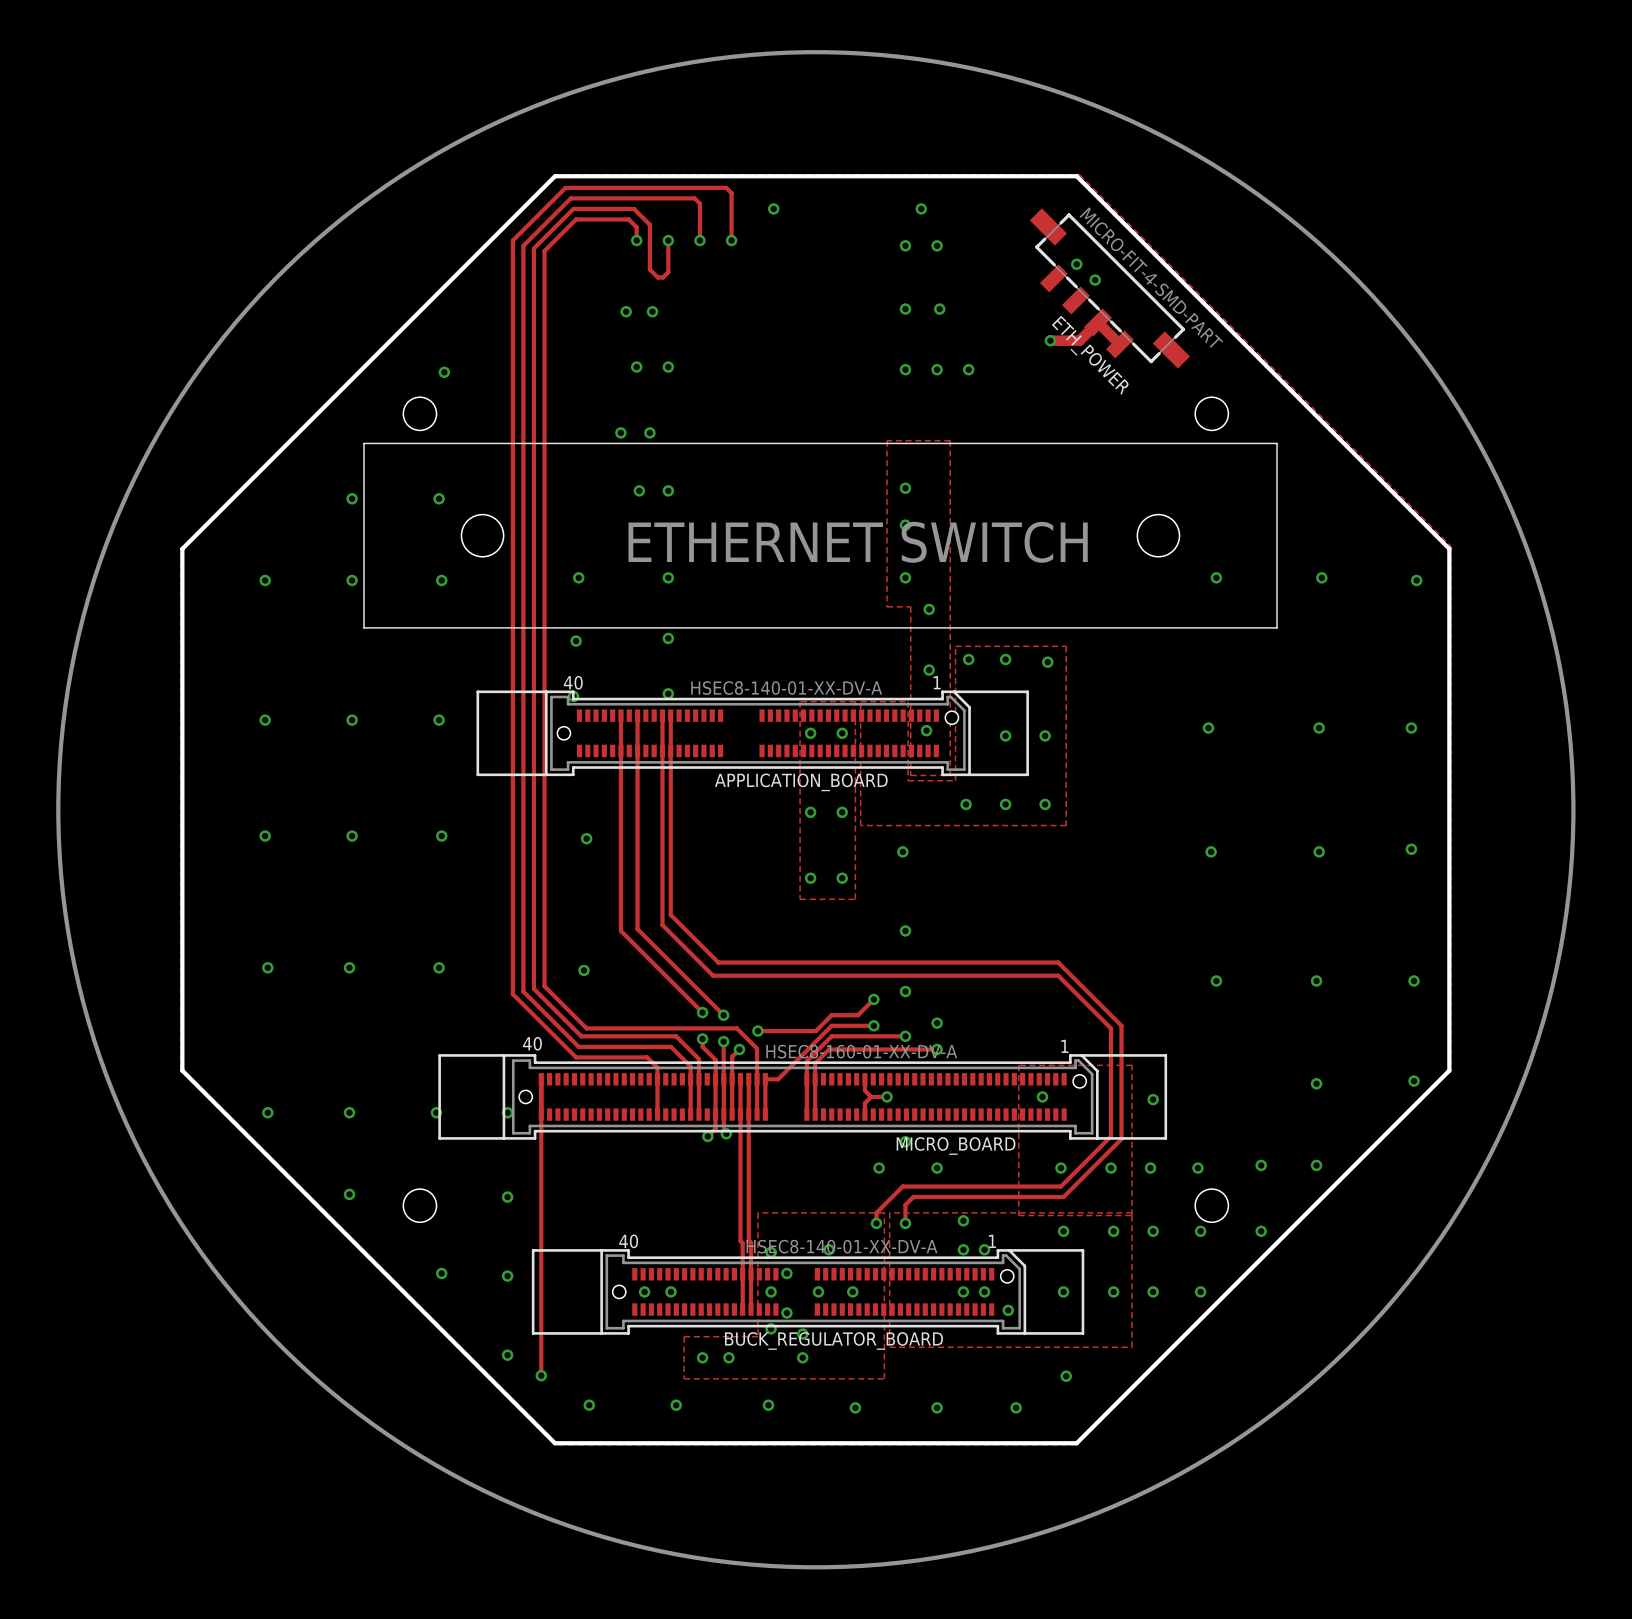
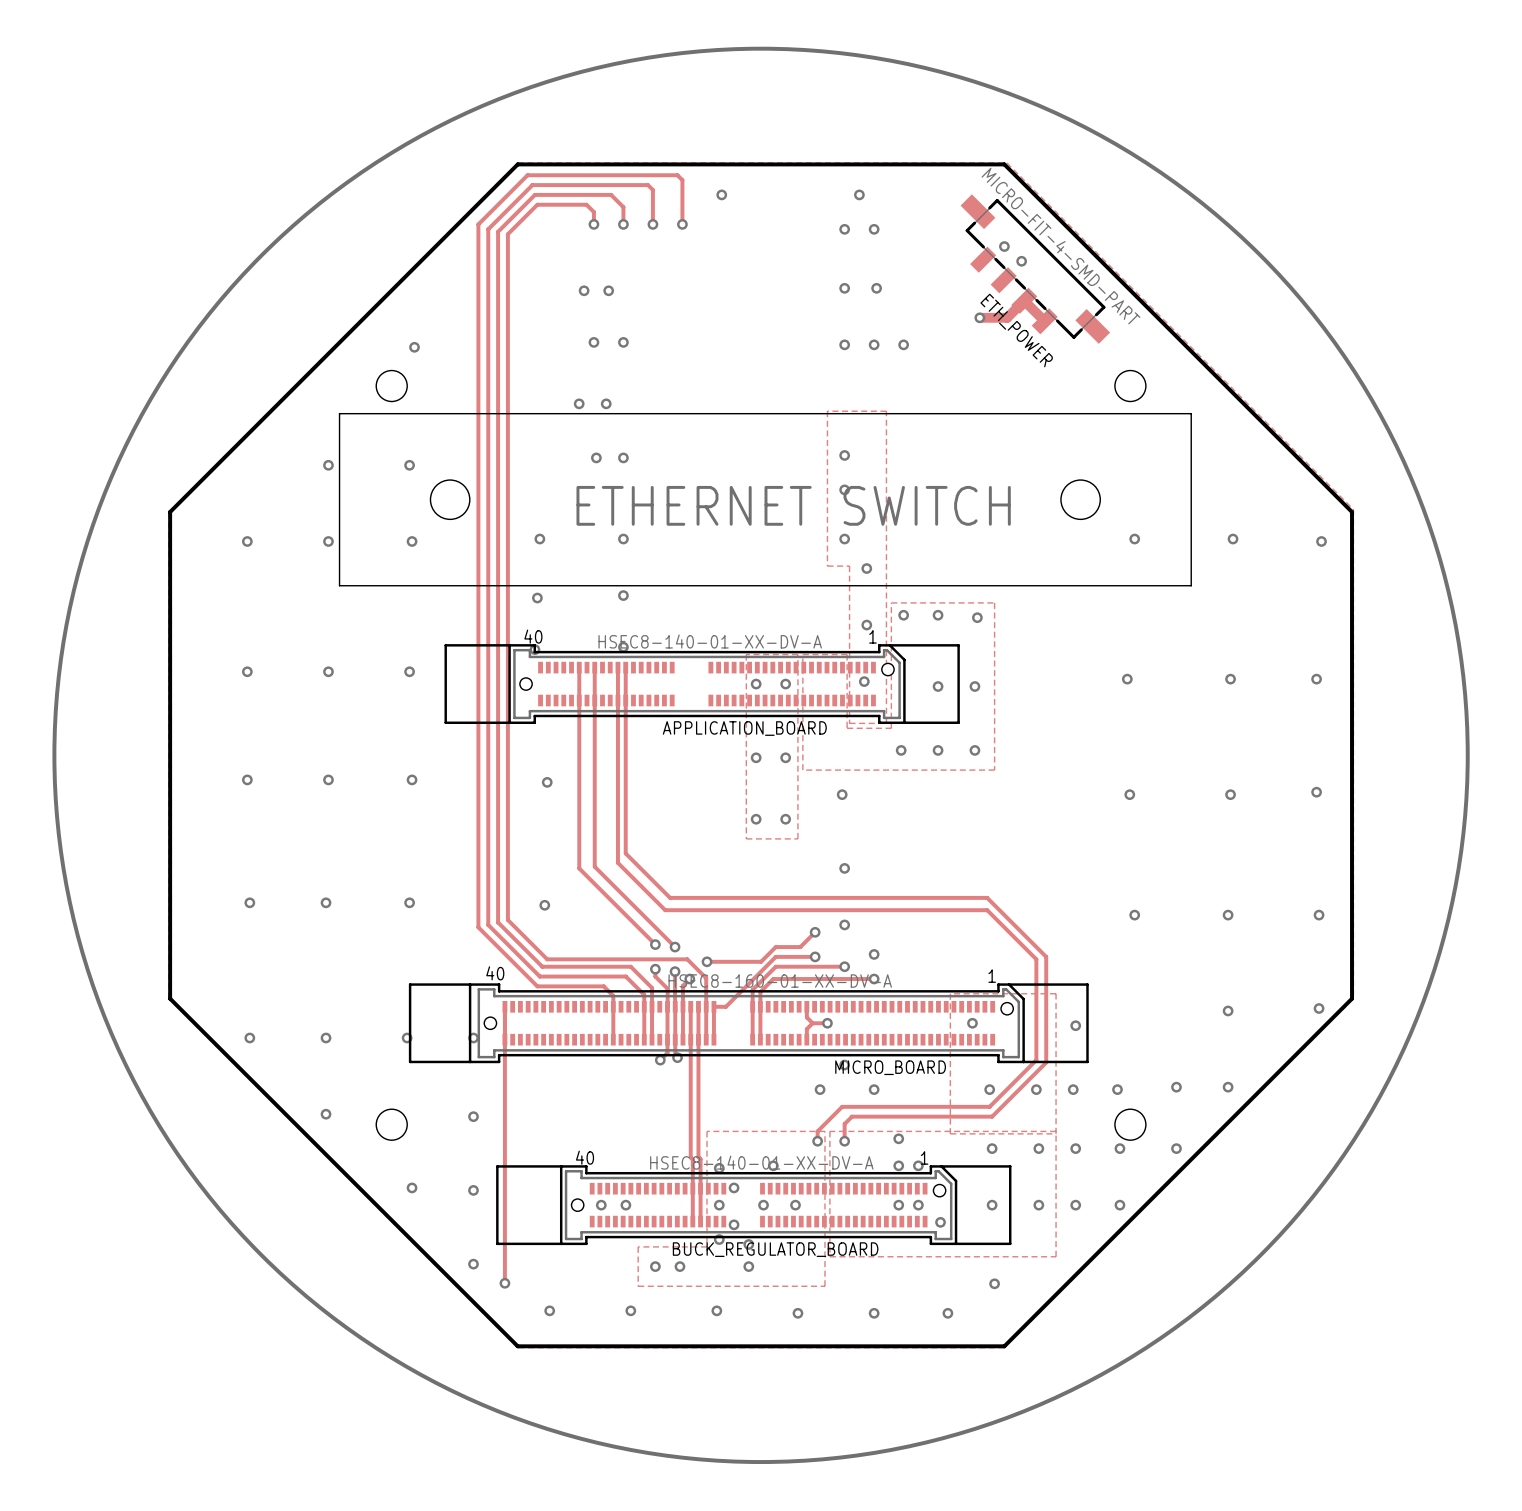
track: (634, 208) (649, 224) (649, 269) (657, 277) (663, 277) (668, 272) (668, 240) -> (591, 194) (611, 194) (623, 207) (623, 224)

